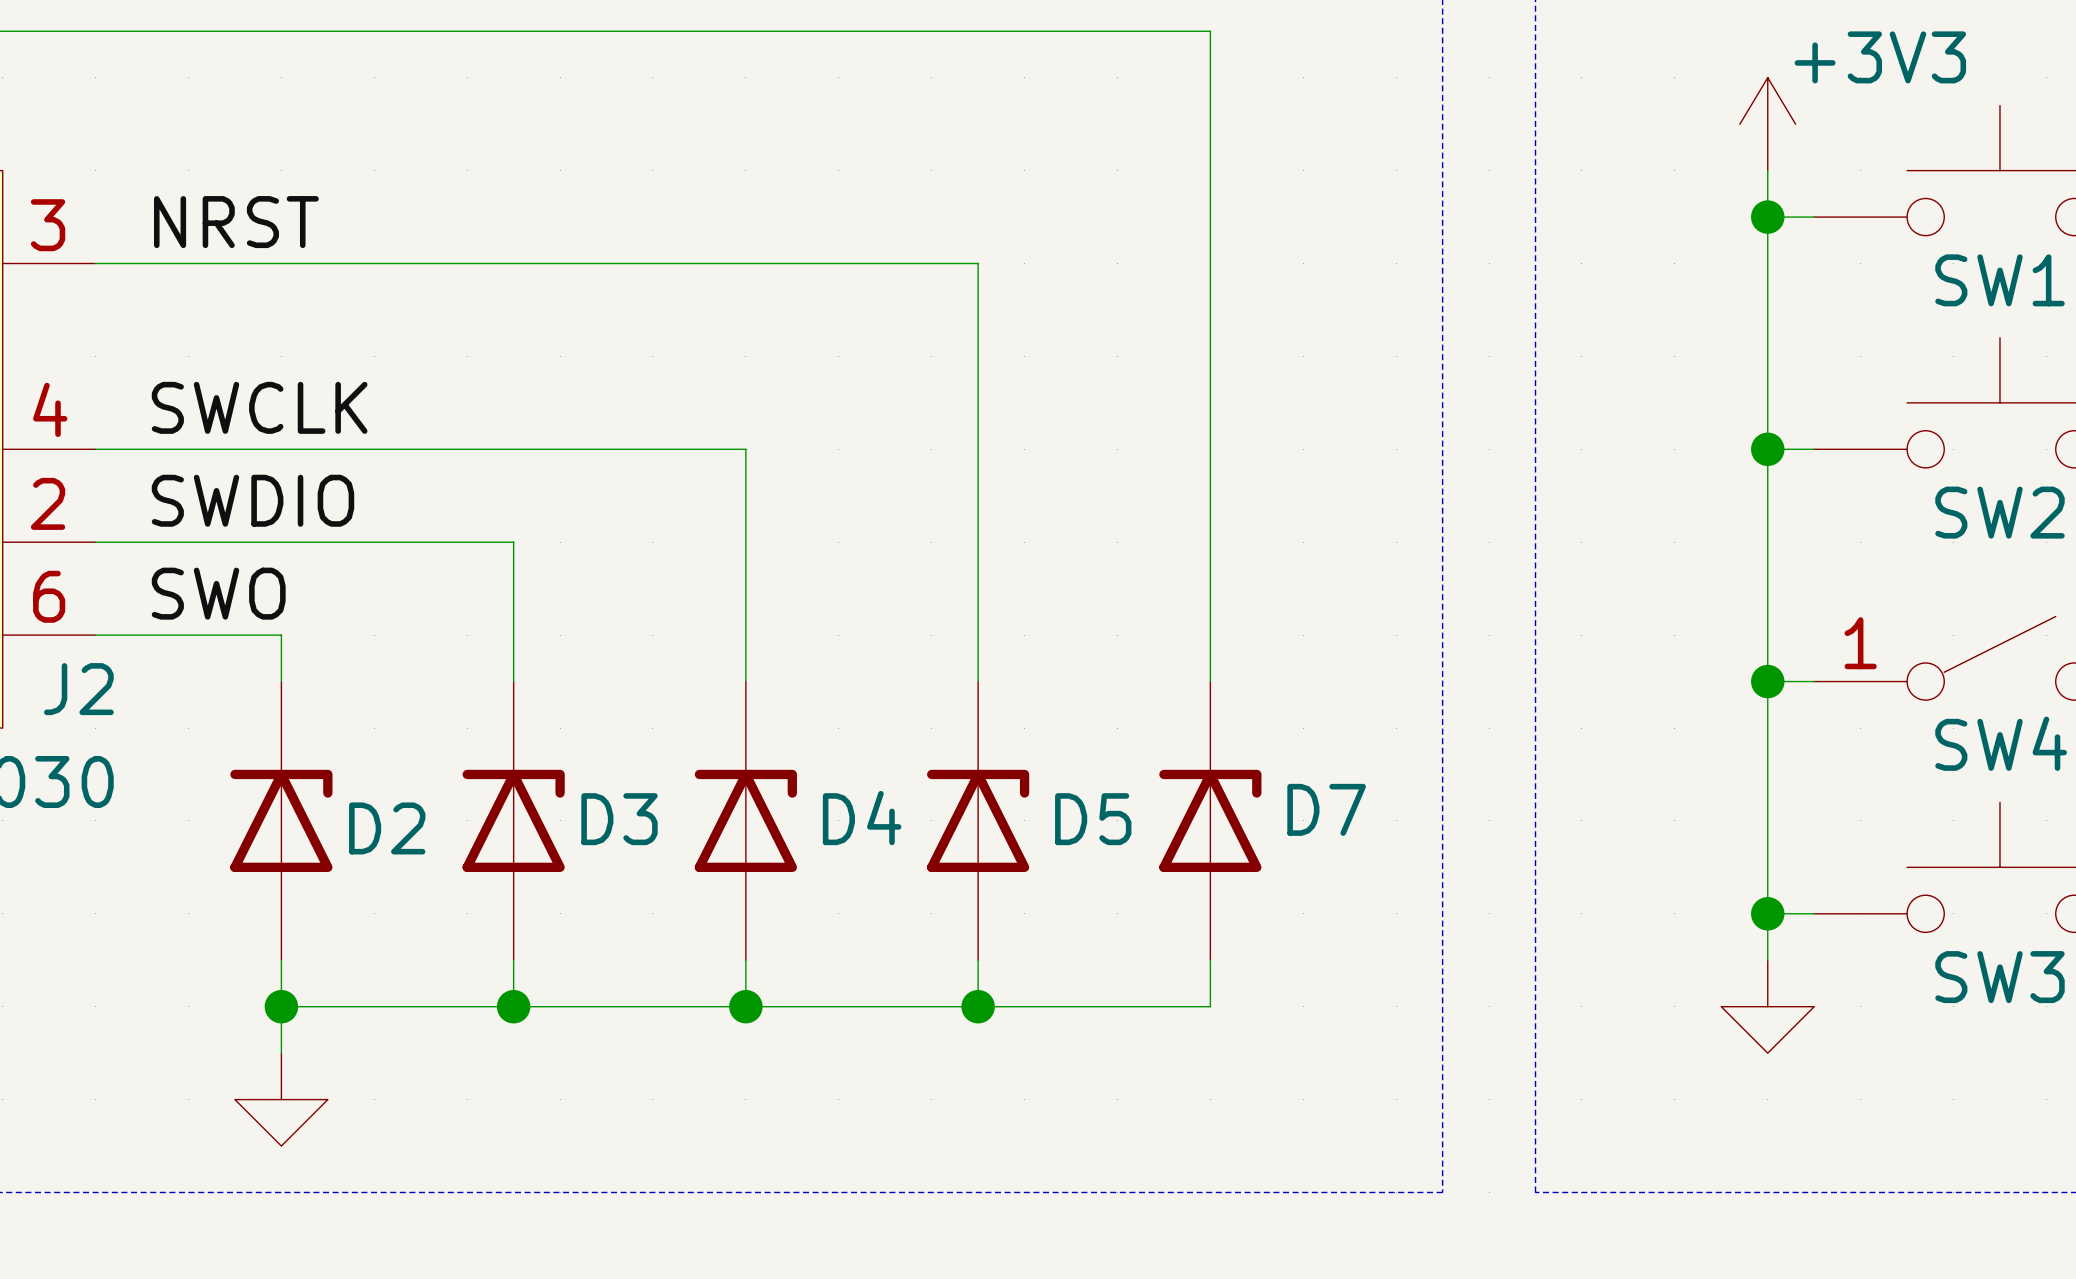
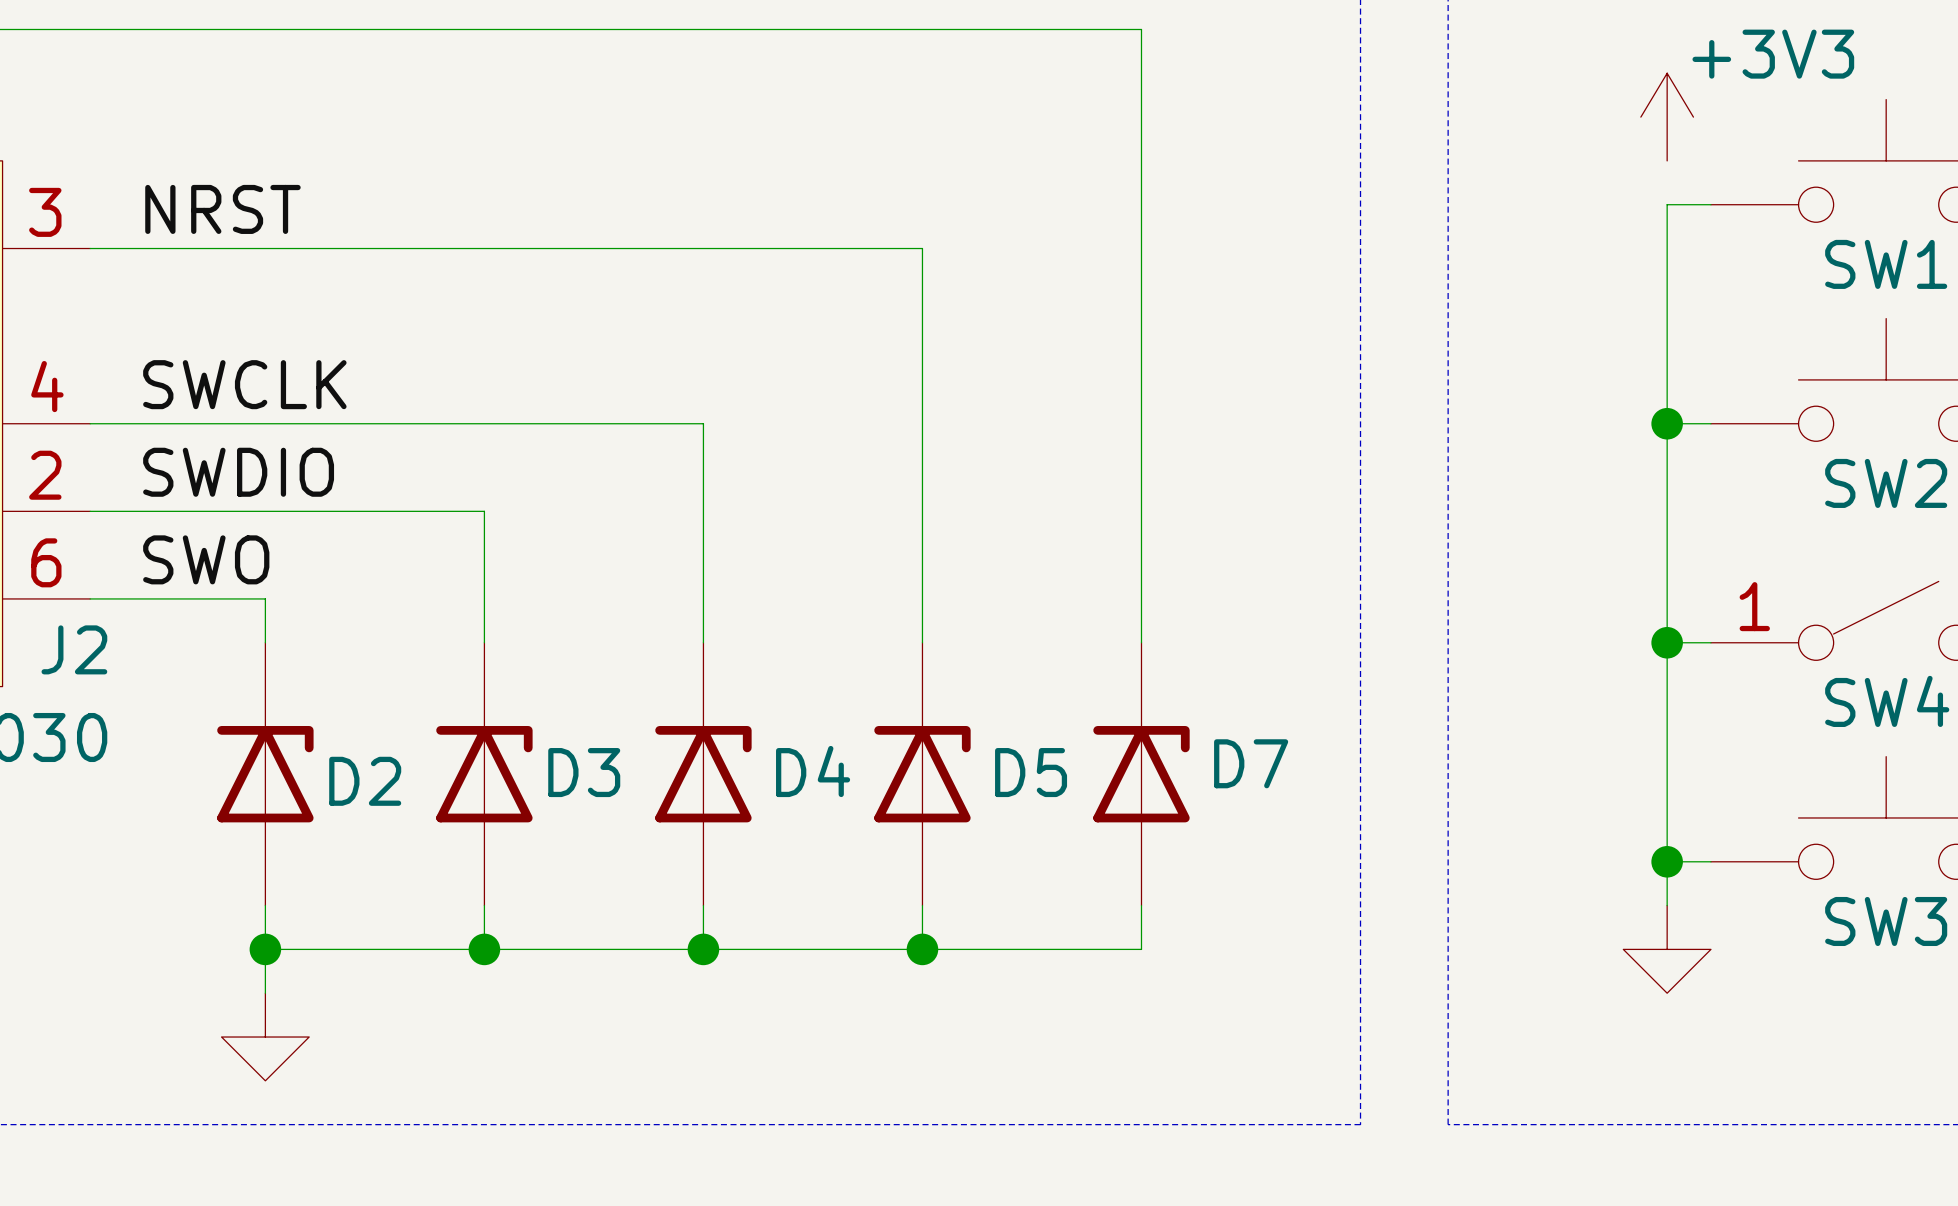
wire: (1767, 170) (1767, 217) -> none
junction: (1767, 217) -> none

